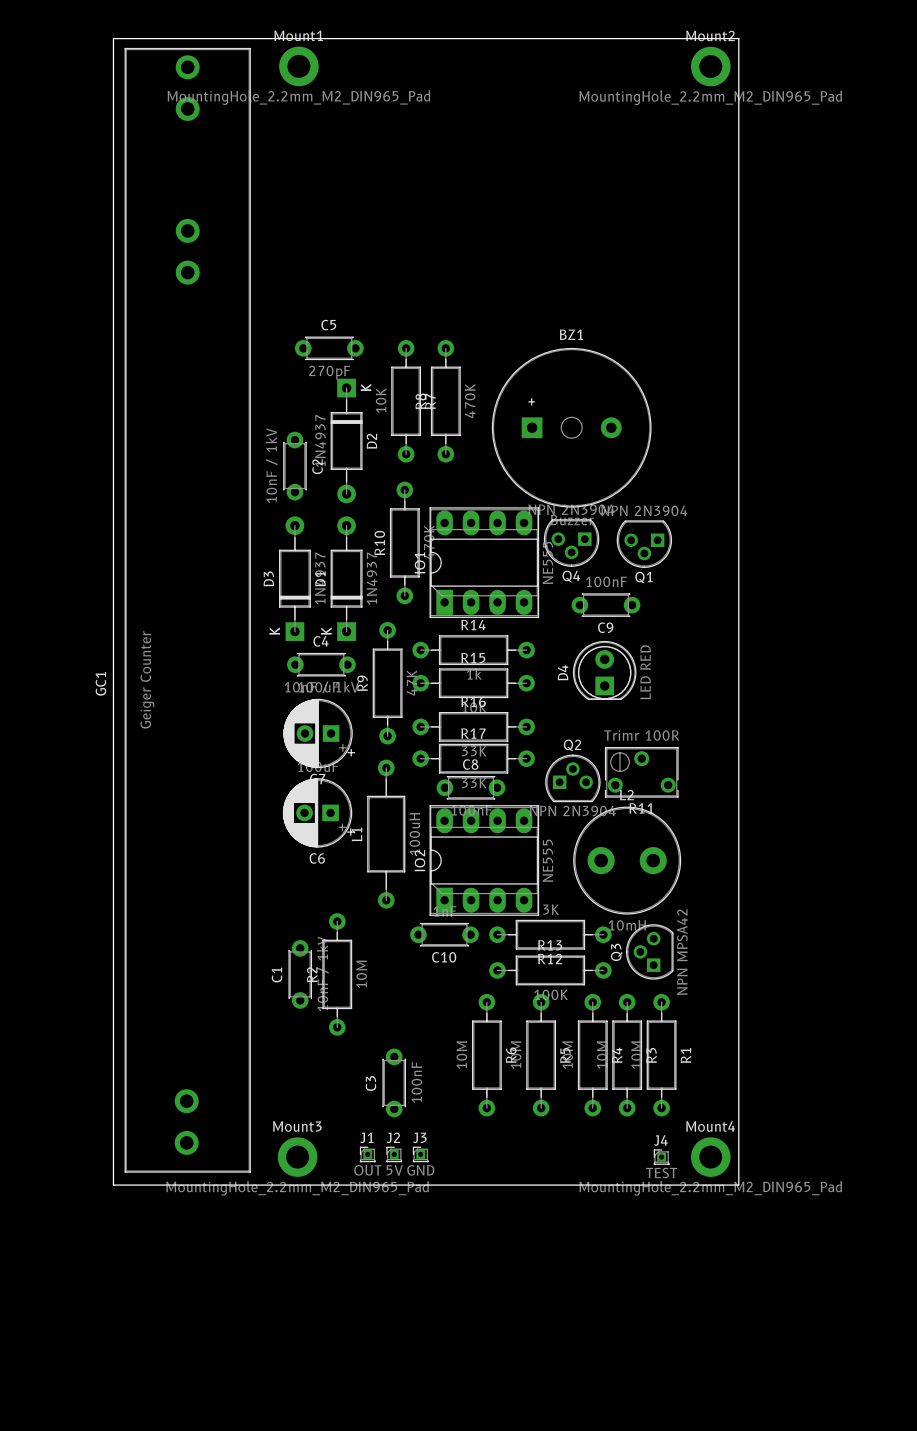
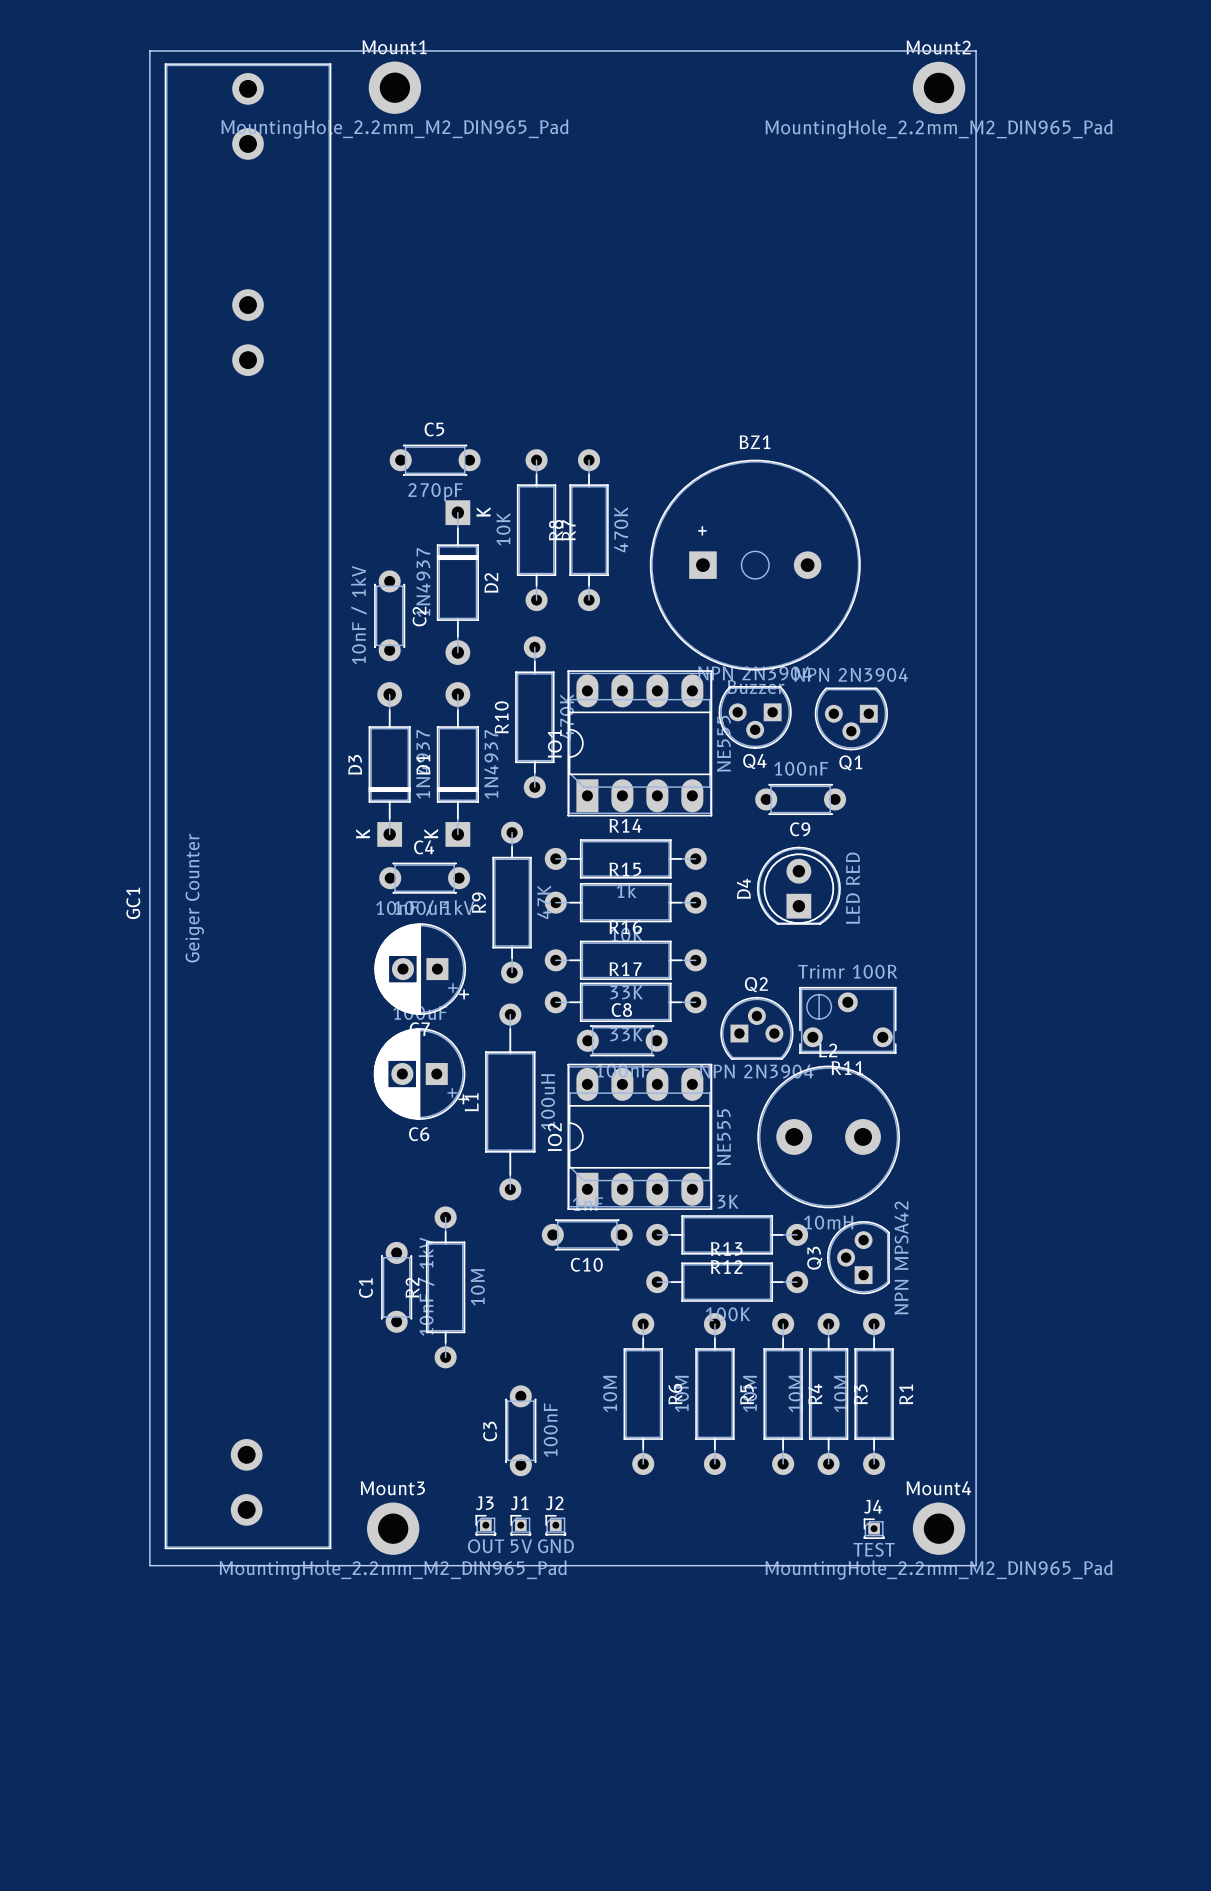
J1 name: J1 (366, 1137) -> J3 (484, 1503)
J2 name: J2 (393, 1137) -> J1 (519, 1503)
J3 name: J3 (419, 1137) -> J2 (554, 1503)

